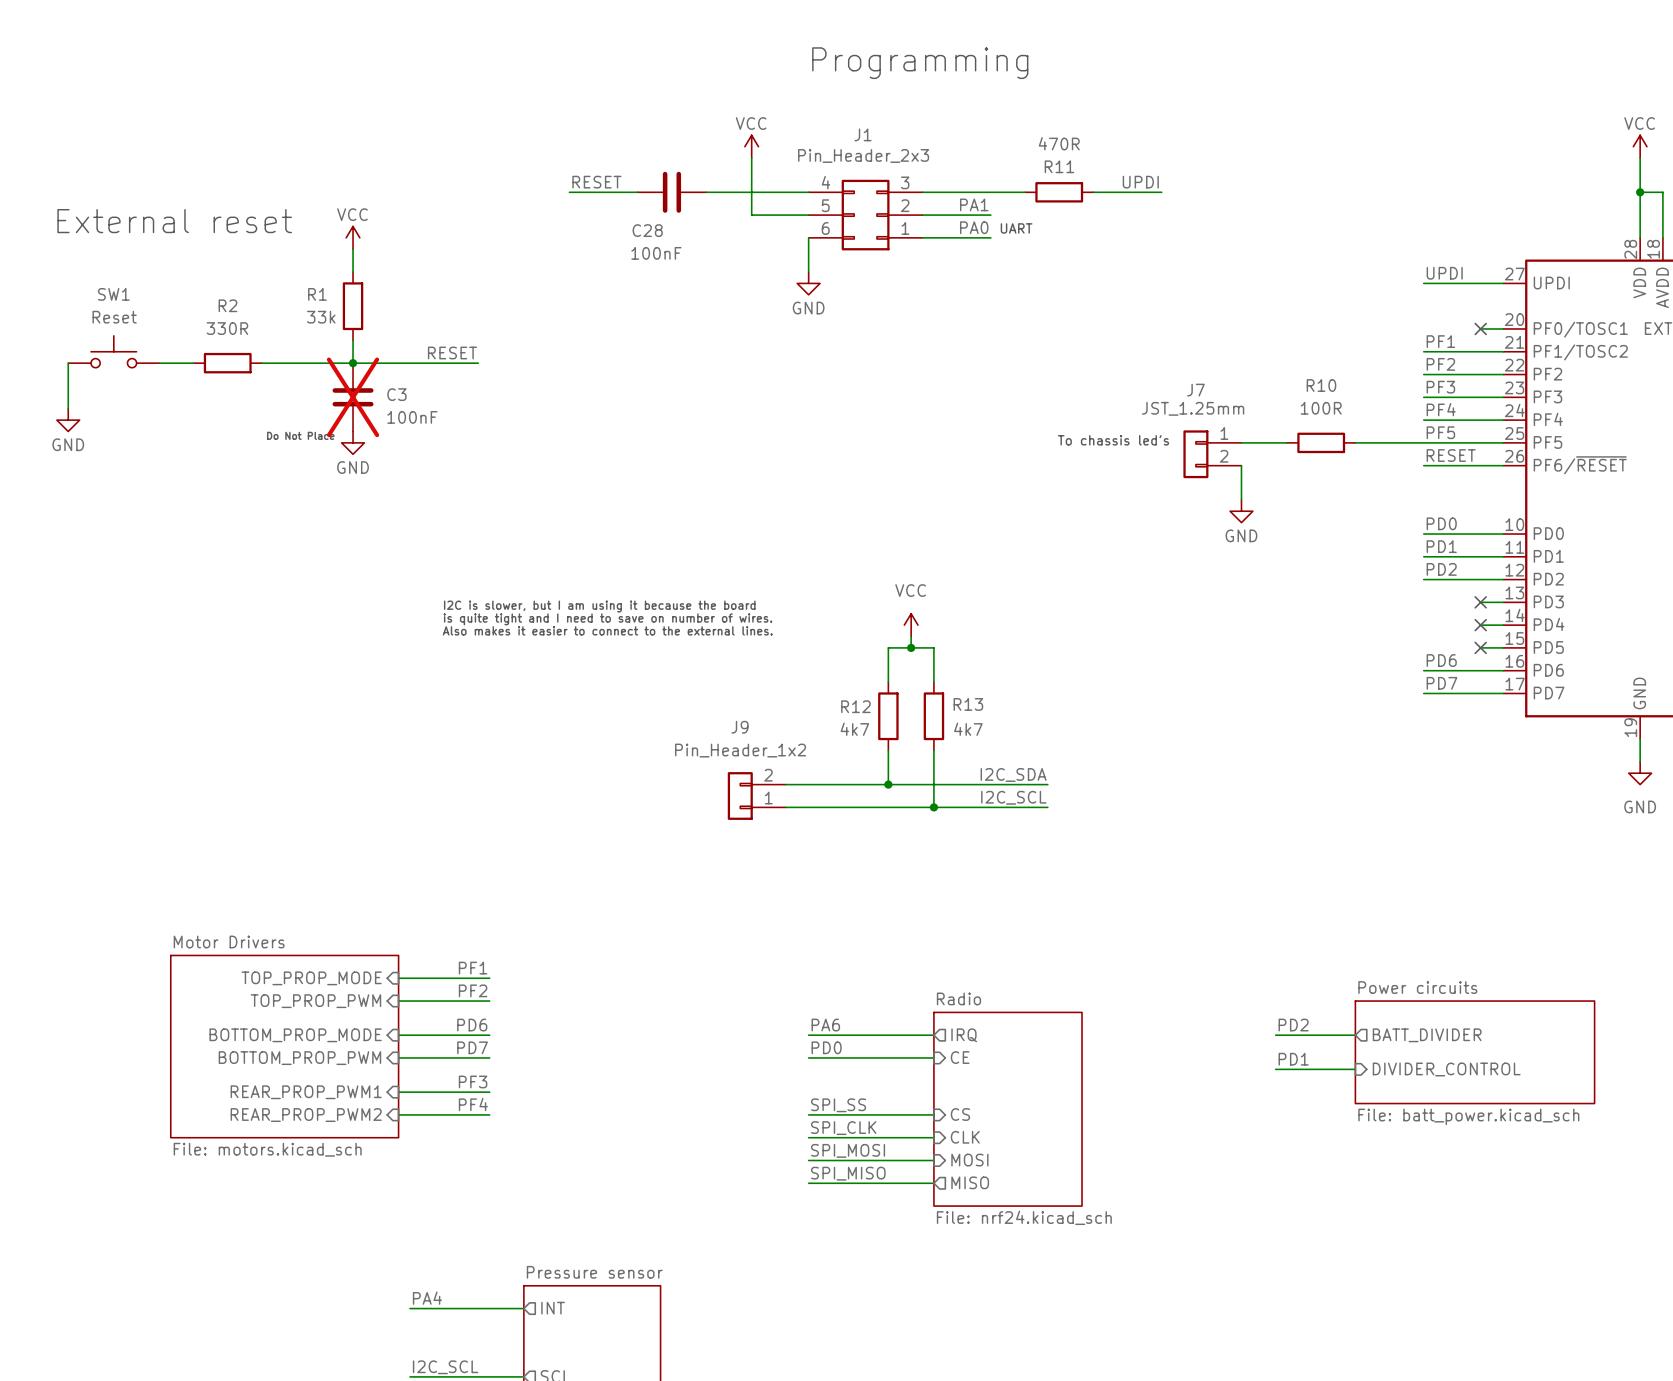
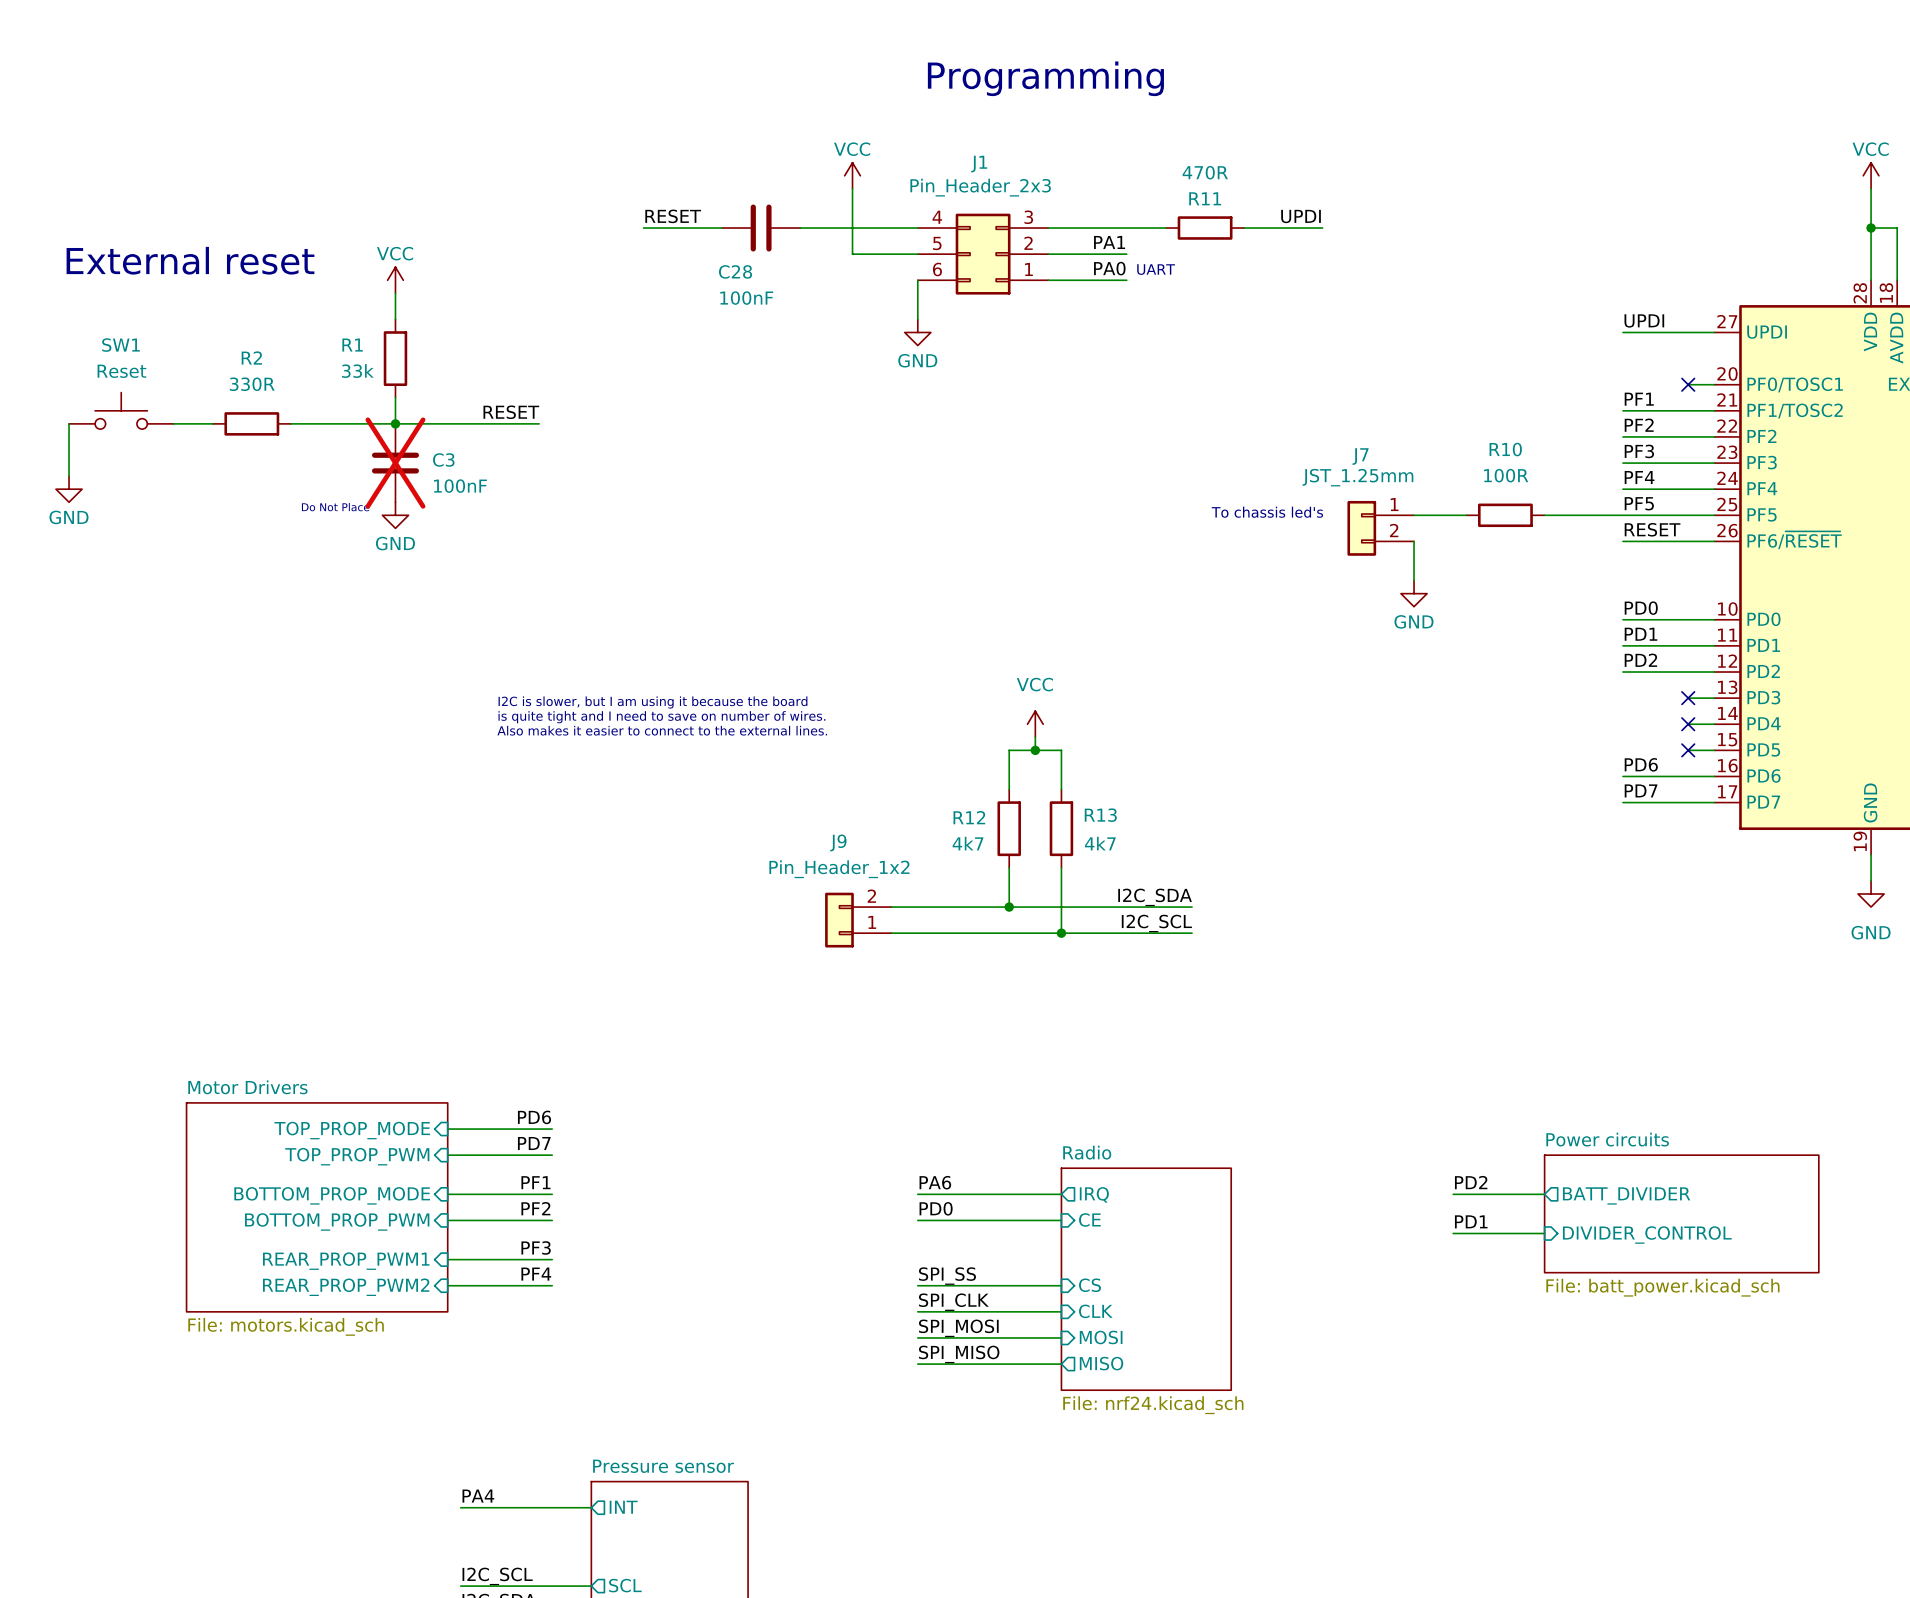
label: PF1 (473, 968) -> PD6 (534, 1117)
label: PF2 (473, 990) -> PD7 (534, 1143)
label: PD6 (472, 1025) -> PF1 (535, 1182)
label: PD7 (472, 1047) -> PF2 (535, 1208)

